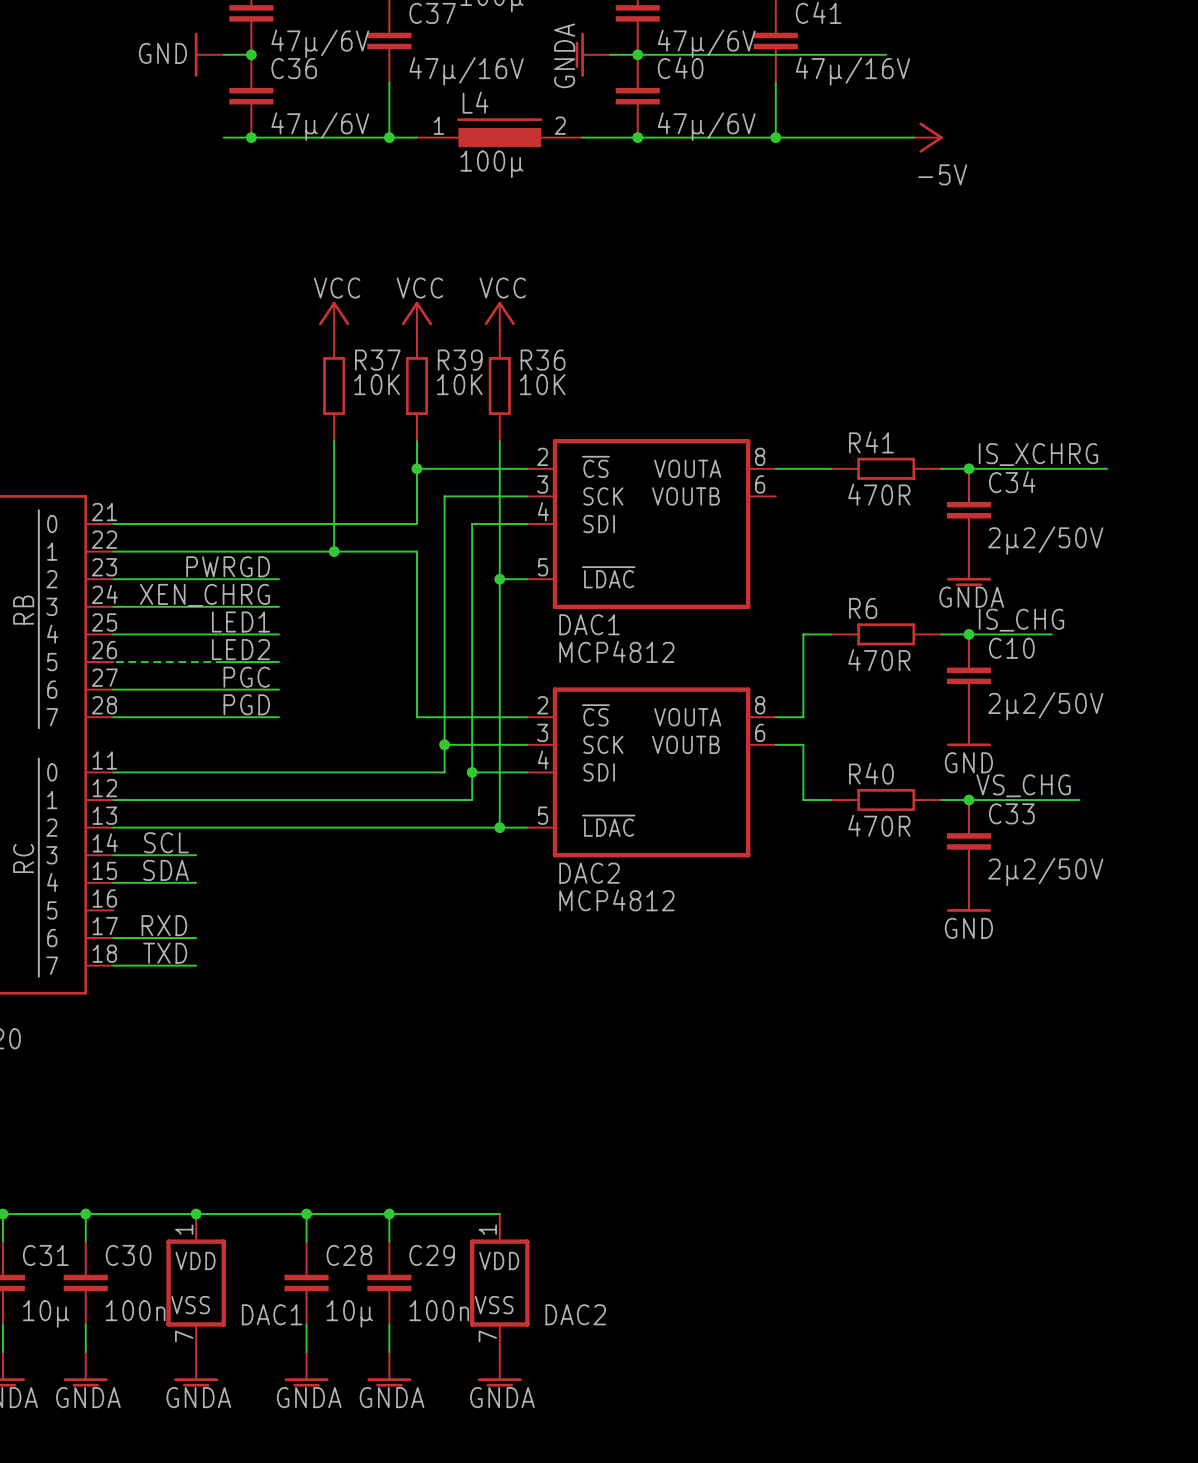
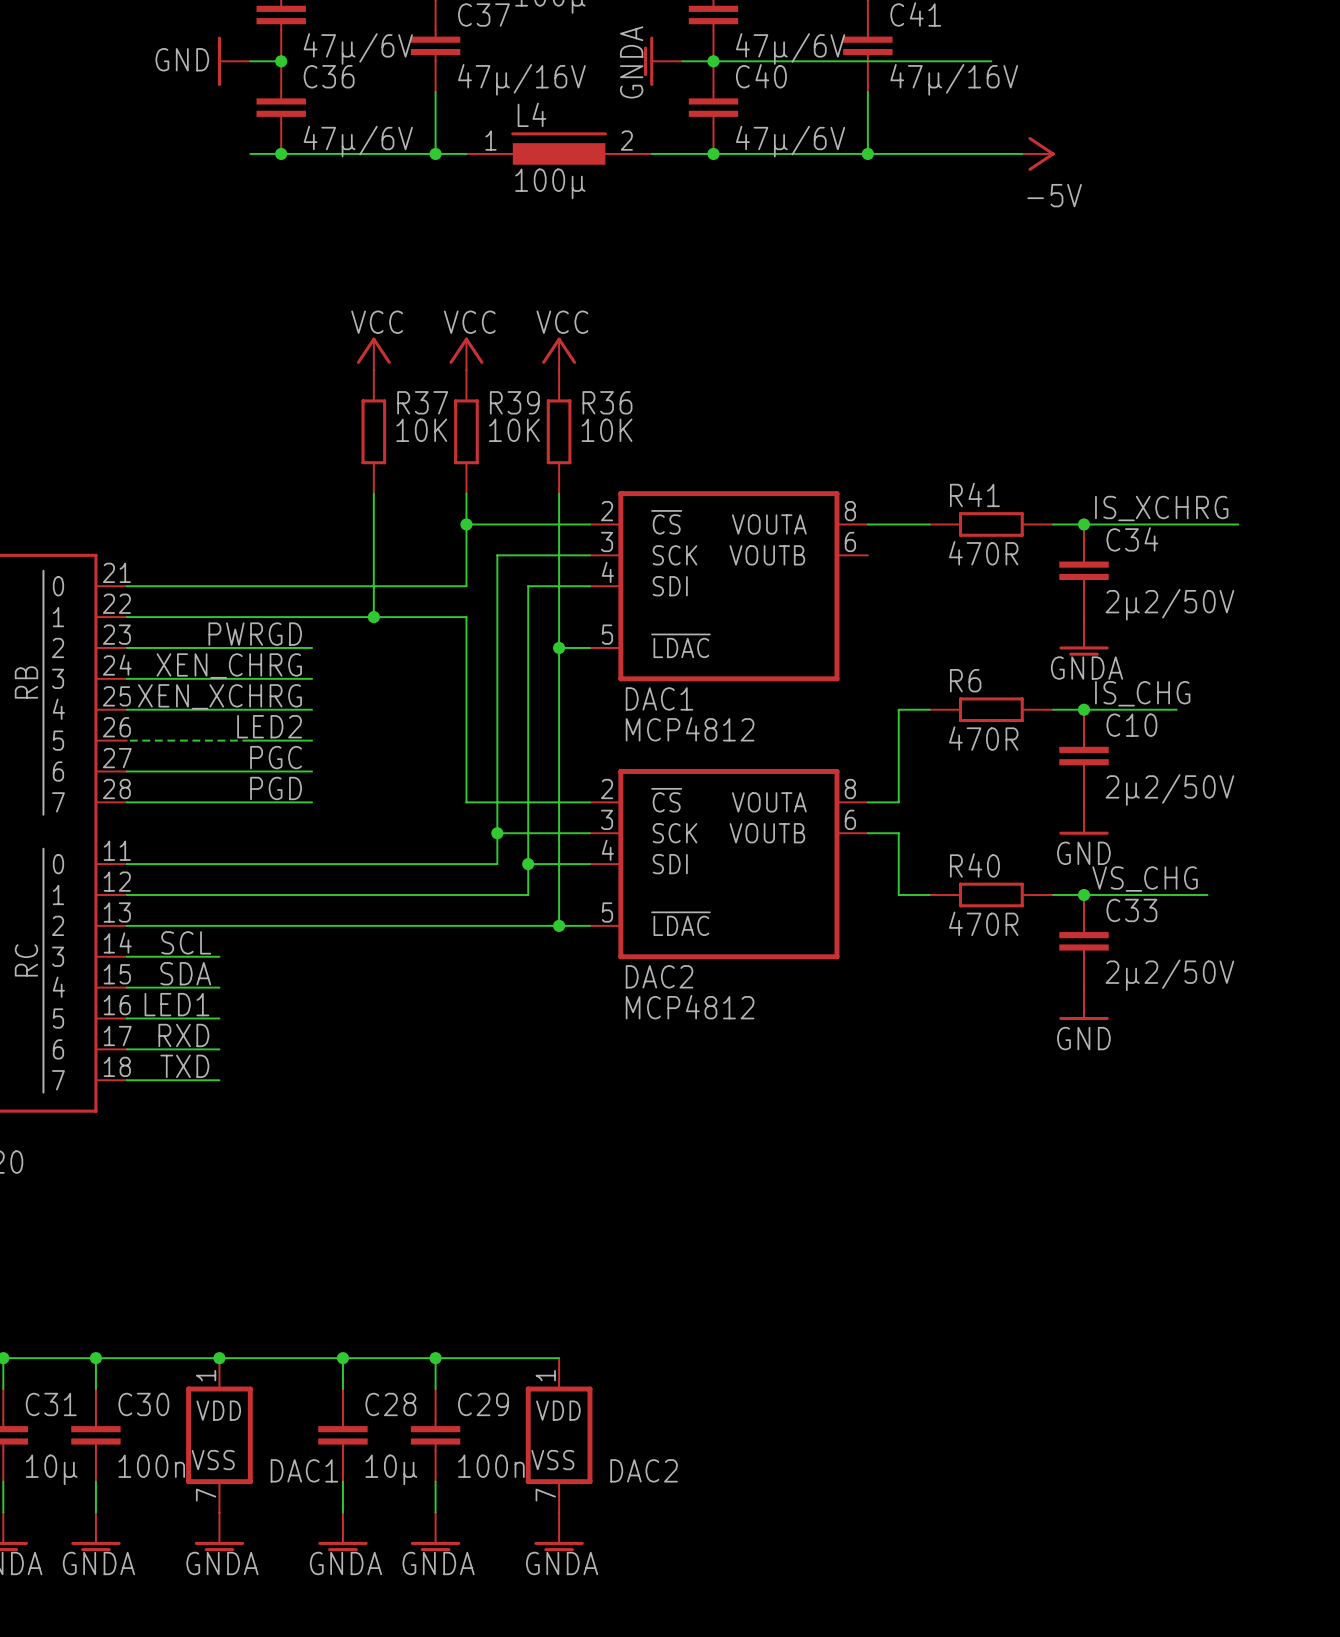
label: LED1 (240, 622) -> XEN_XCHRG (220, 696)
label: none -> LED1 (176, 1004)
wire: none -> (126, 1018) (219, 1018)

